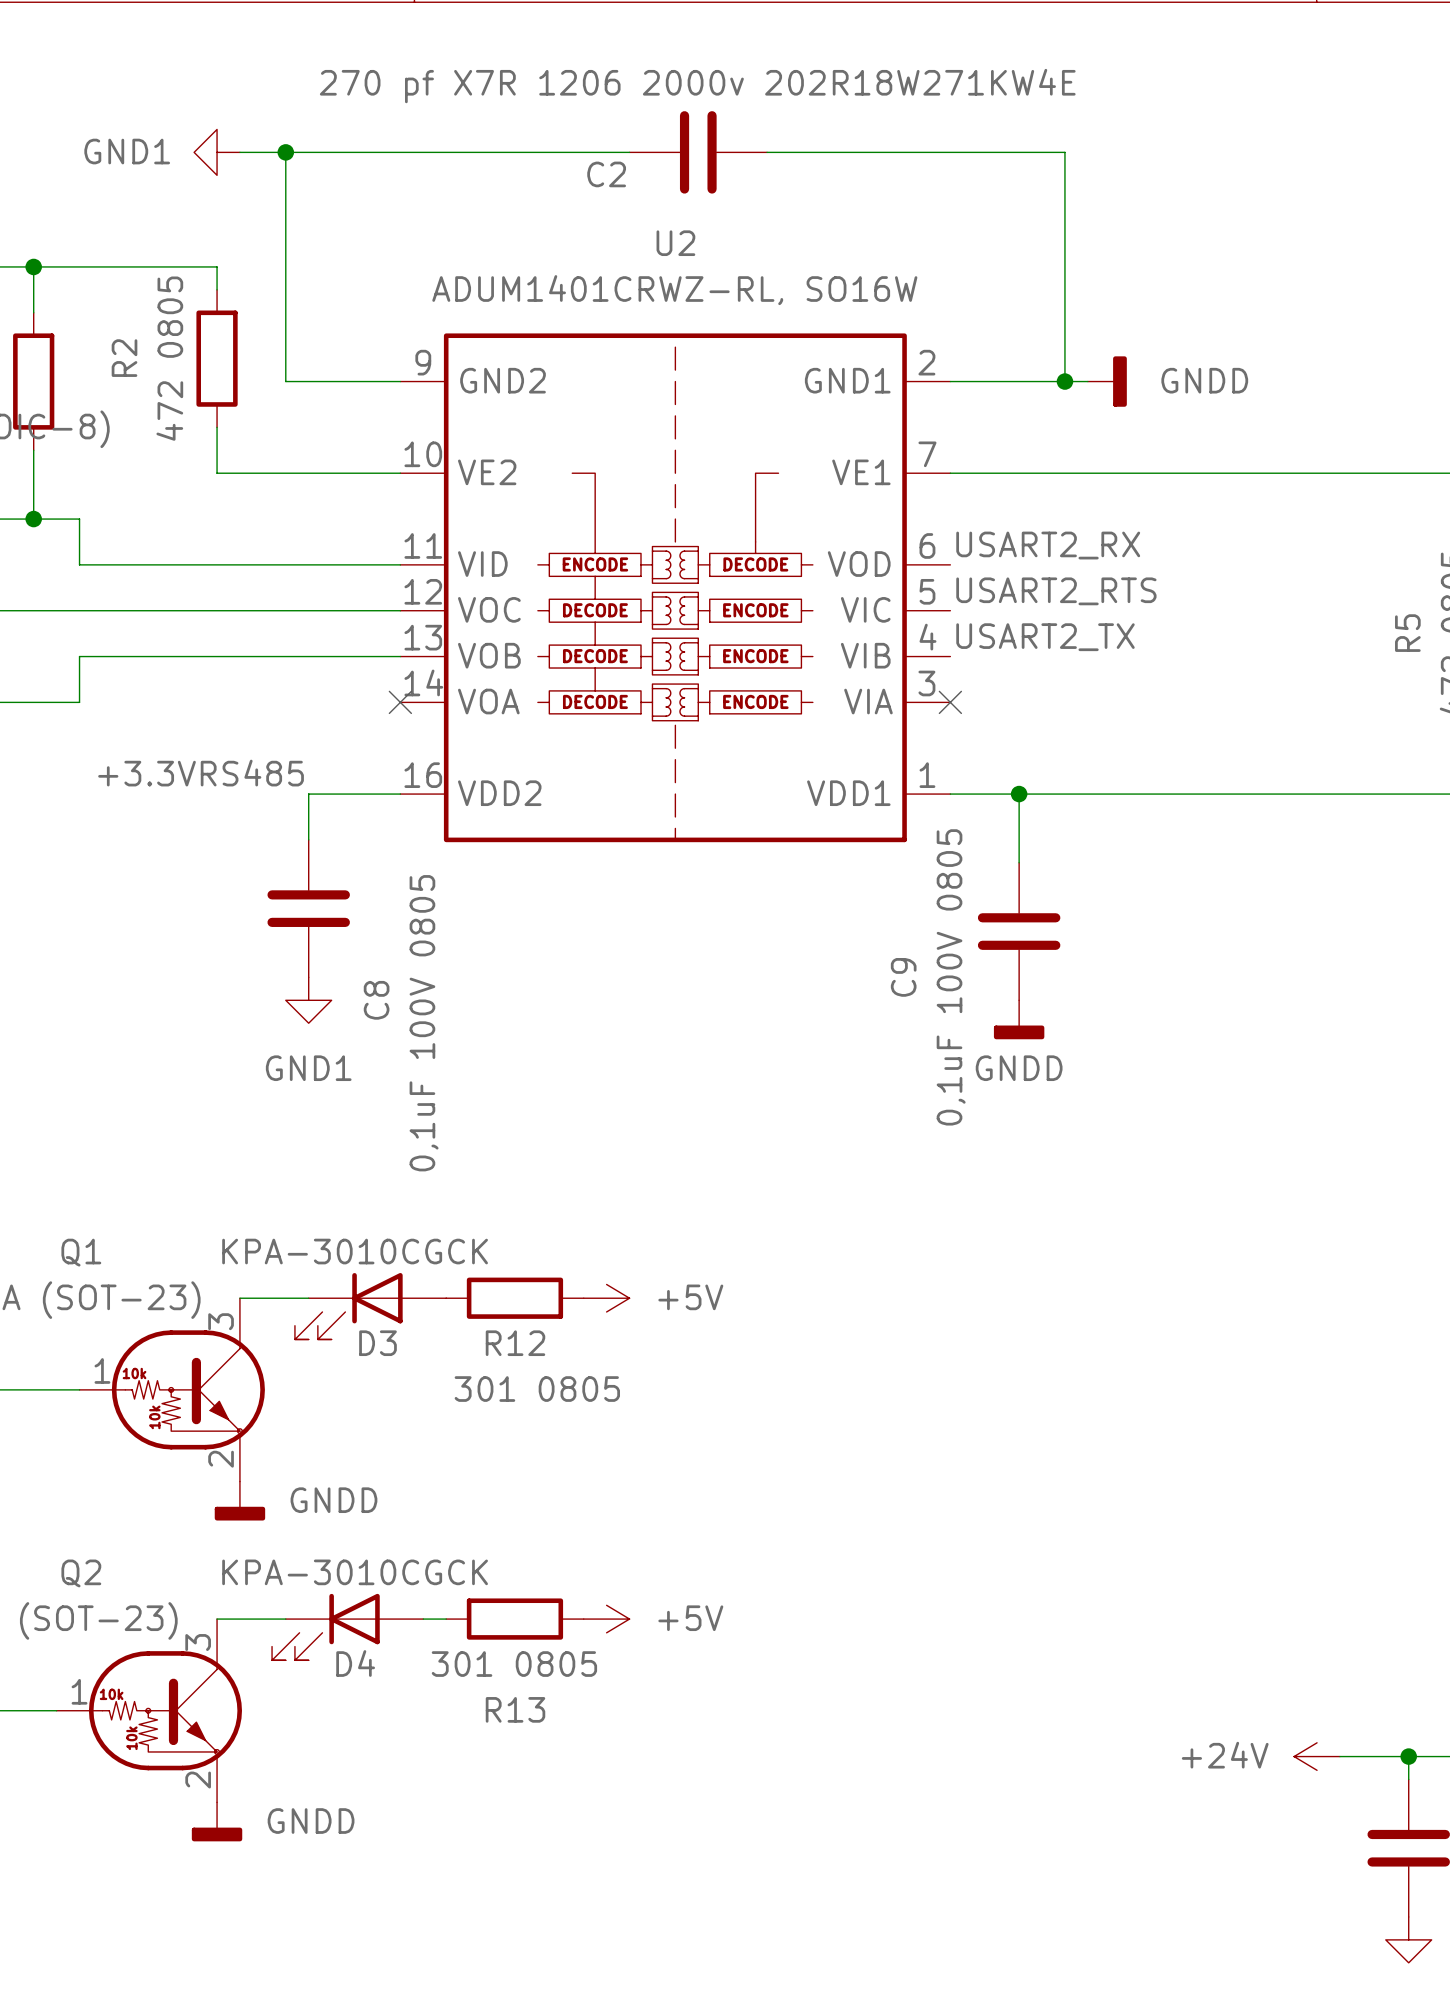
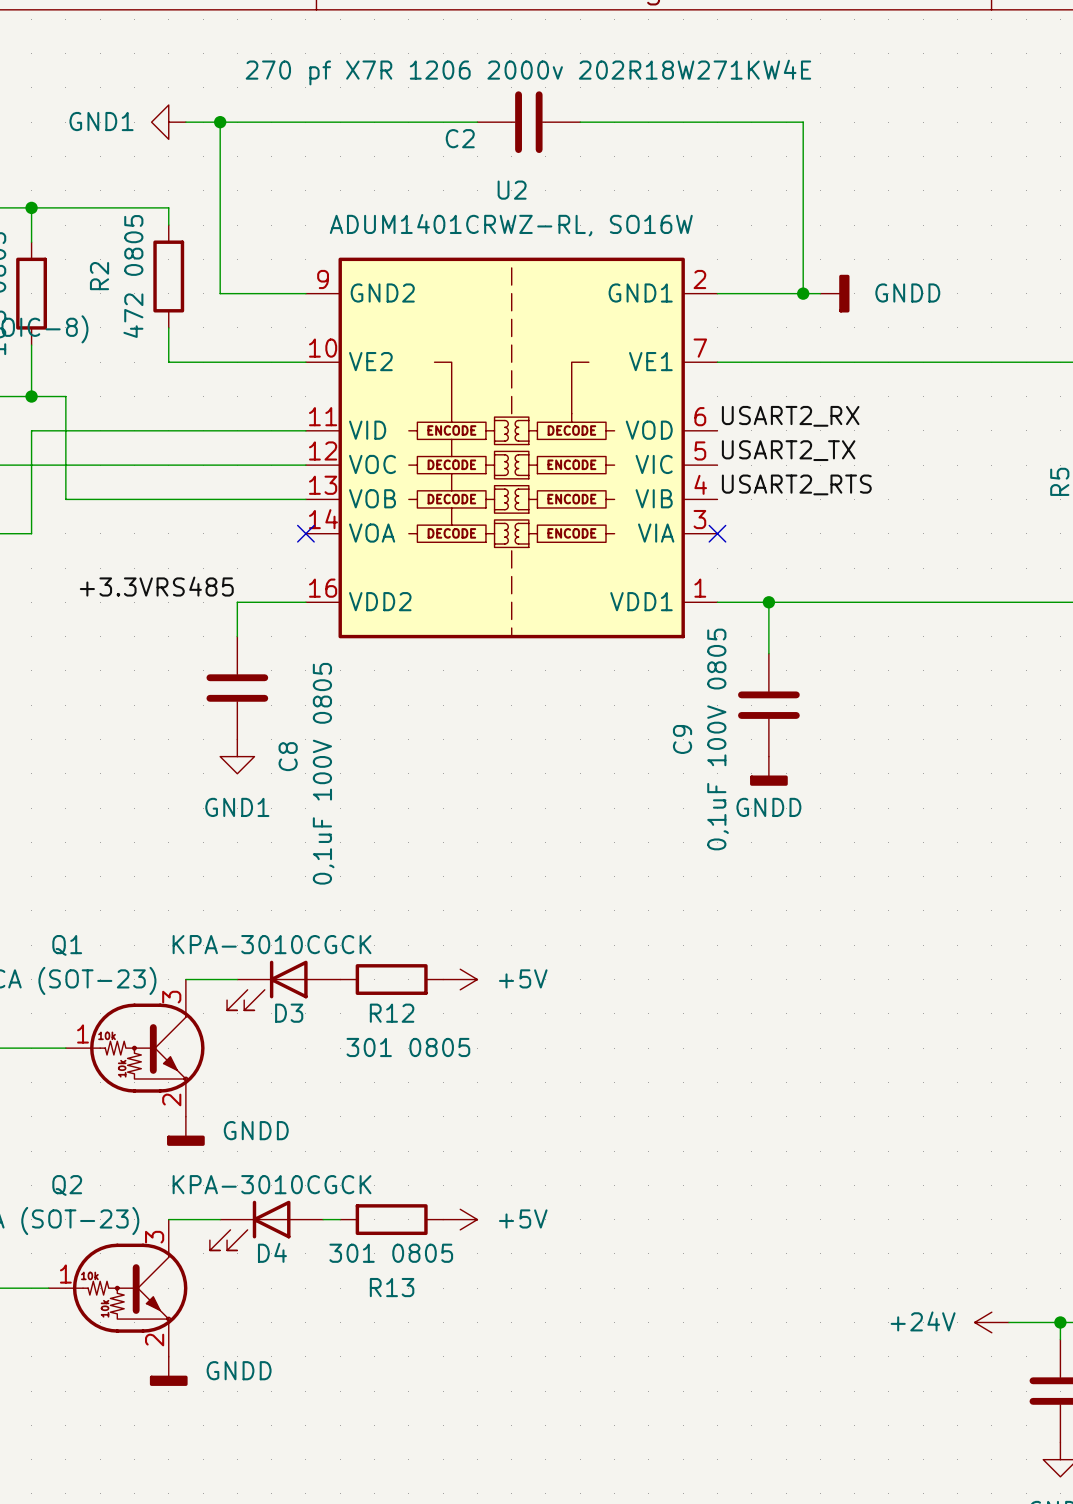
label: USART2_RTS (1056, 591) -> USART2_TX (788, 450)
label: USART2_TX (1045, 637) -> USART2_RTS (796, 484)
wire: (79, 656) (79, 702) (33, 702) -> (65, 499) (65, 430) (31, 430) (31, 533)

